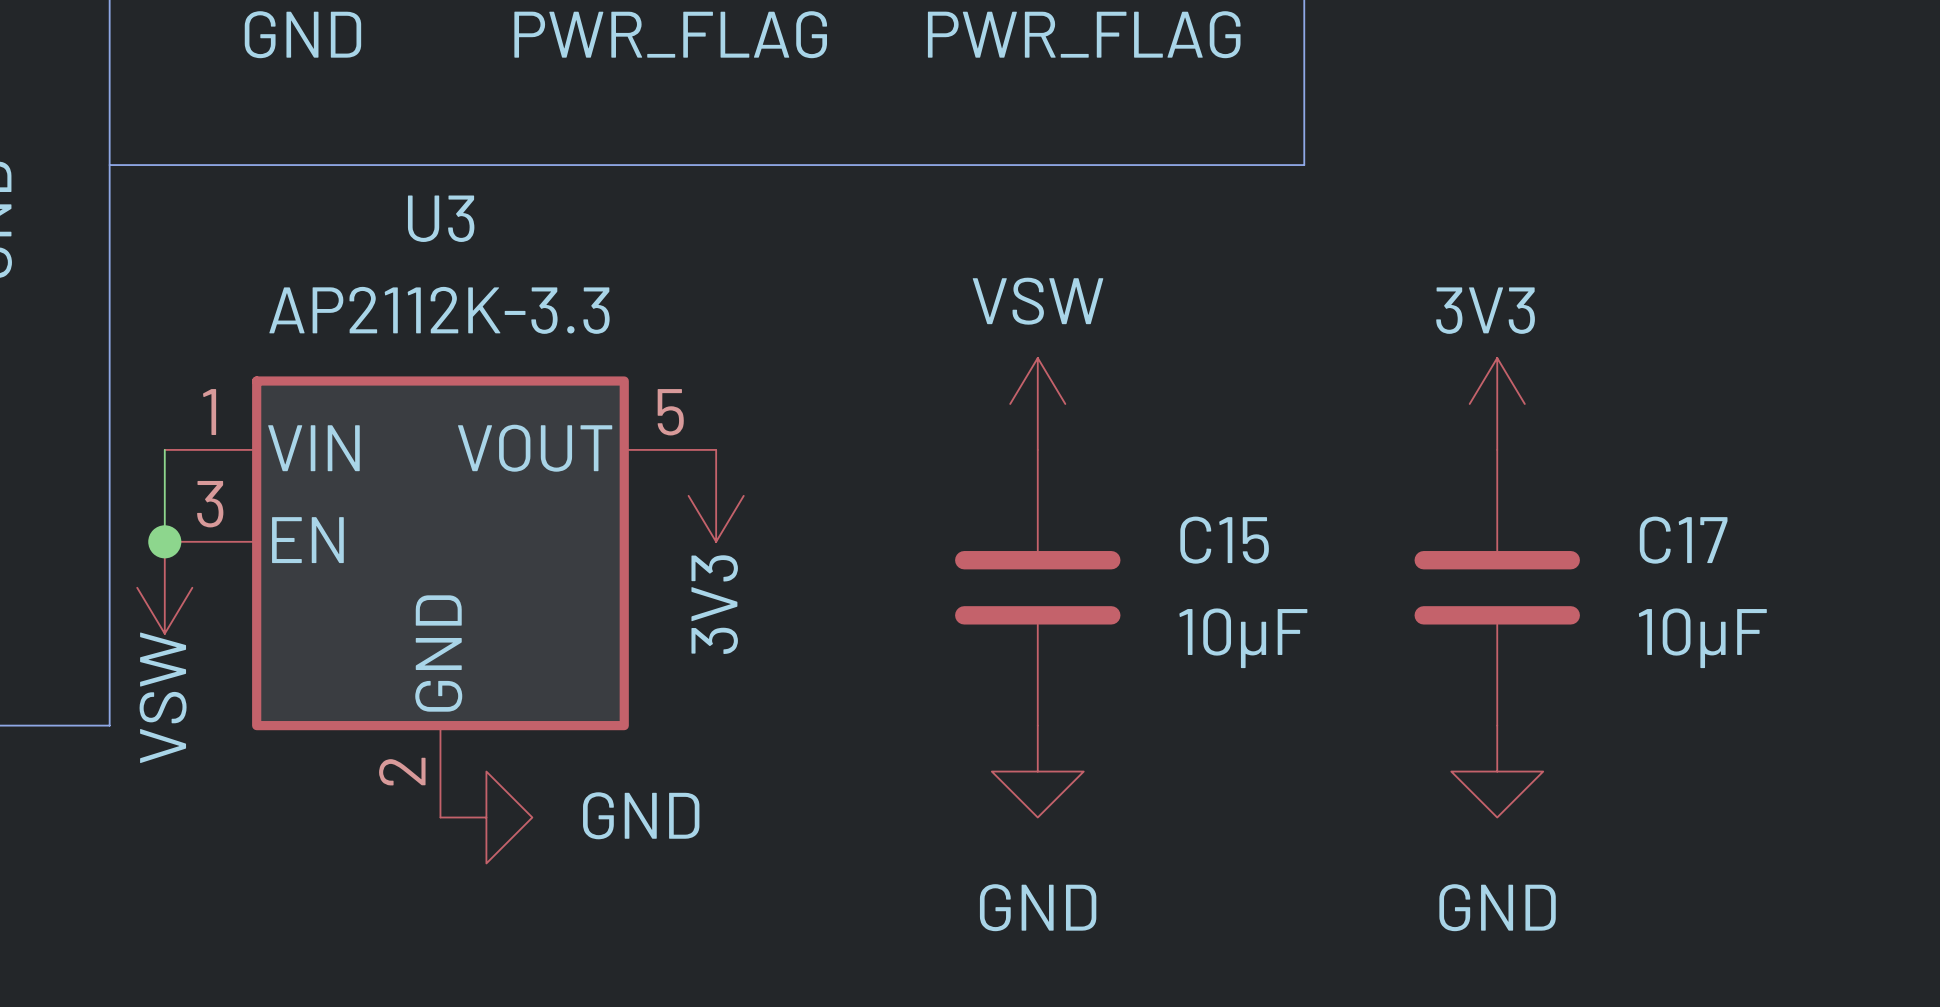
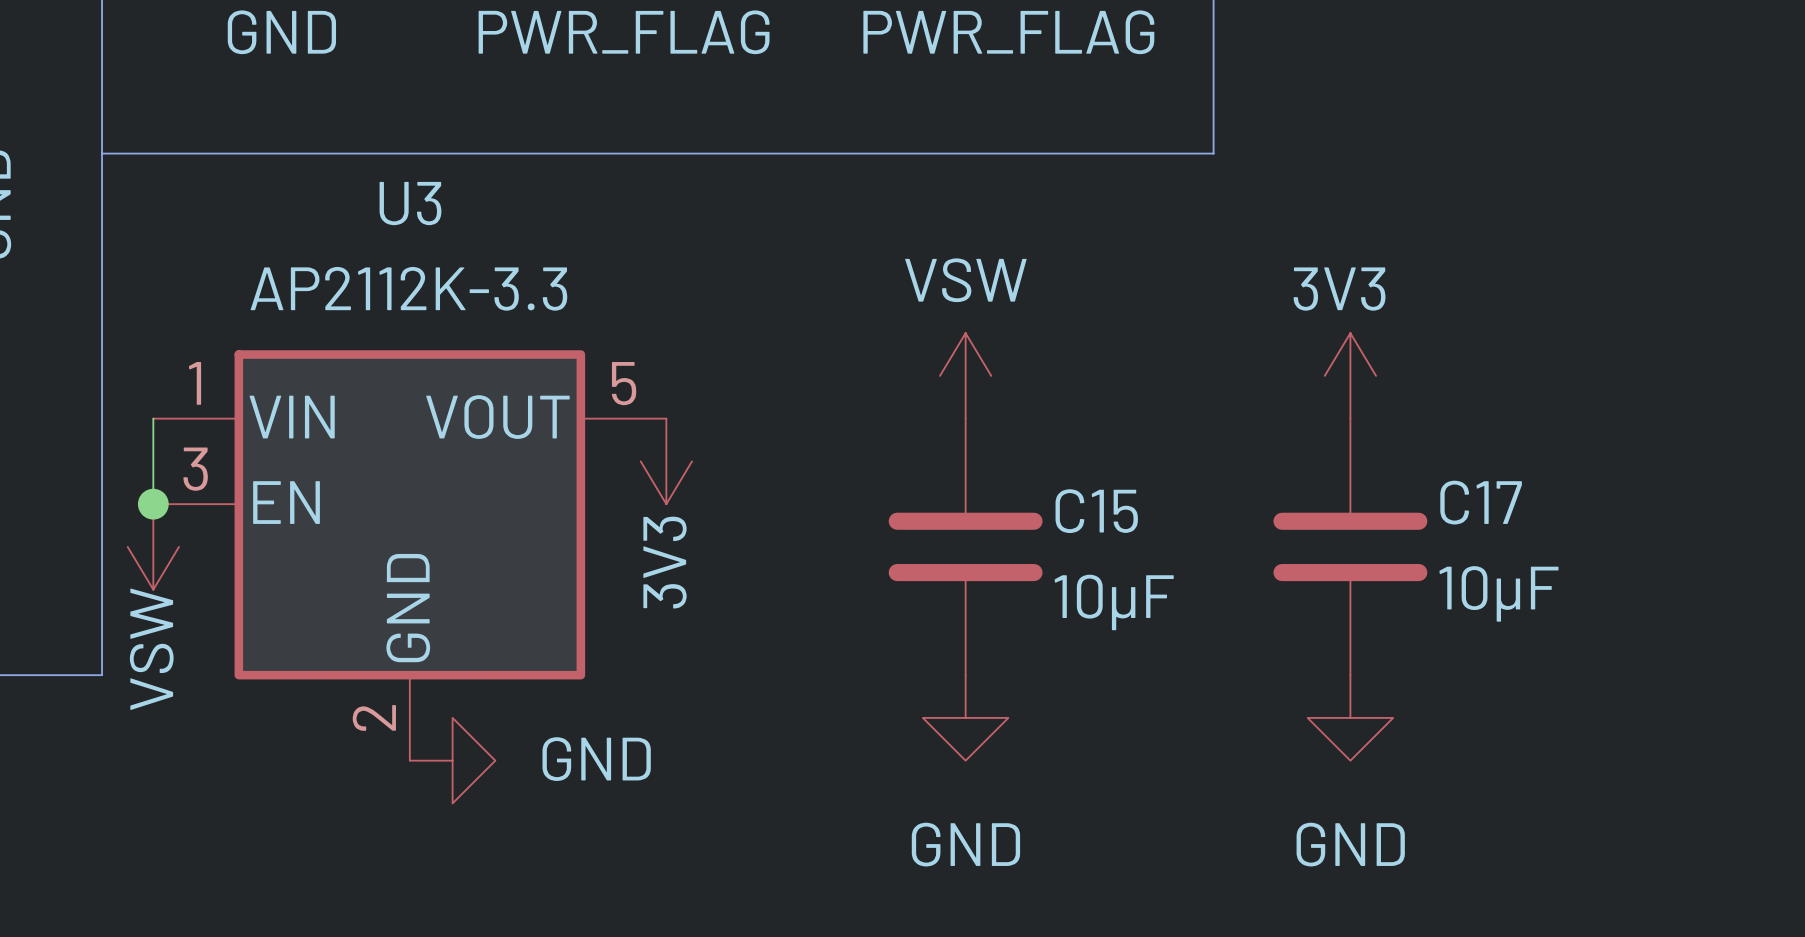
power symbol position: 3V3 (1497, 403) -> 3V3 (1350, 375)
C15 name position: C15 (1224, 540) -> C15 (1096, 511)
C17 name position: C17 (1683, 540) -> C17 (1481, 502)
C17 position: (1497, 587) -> (1350, 546)
C15 value position: 10μF (1243, 638) -> 10μF (1114, 602)
C17 value position: 10μF (1702, 638) -> 10μF (1498, 593)
power symbol position: GND (1497, 771) -> GND (1350, 717)

